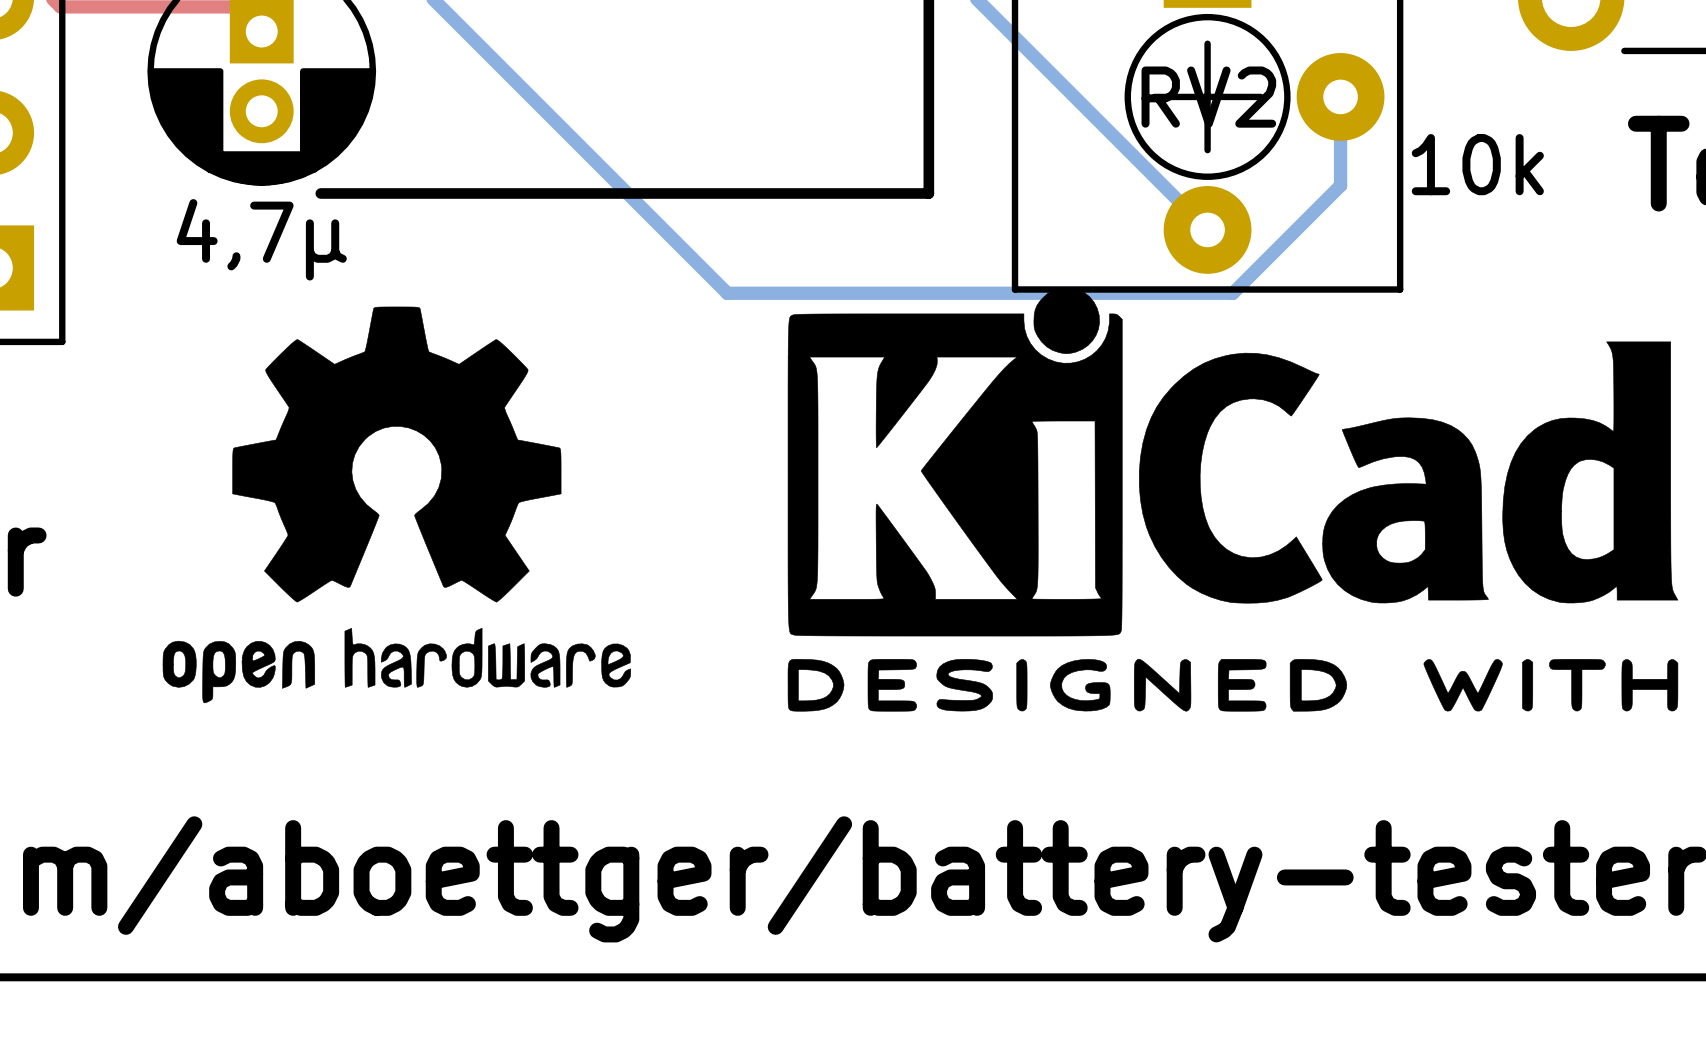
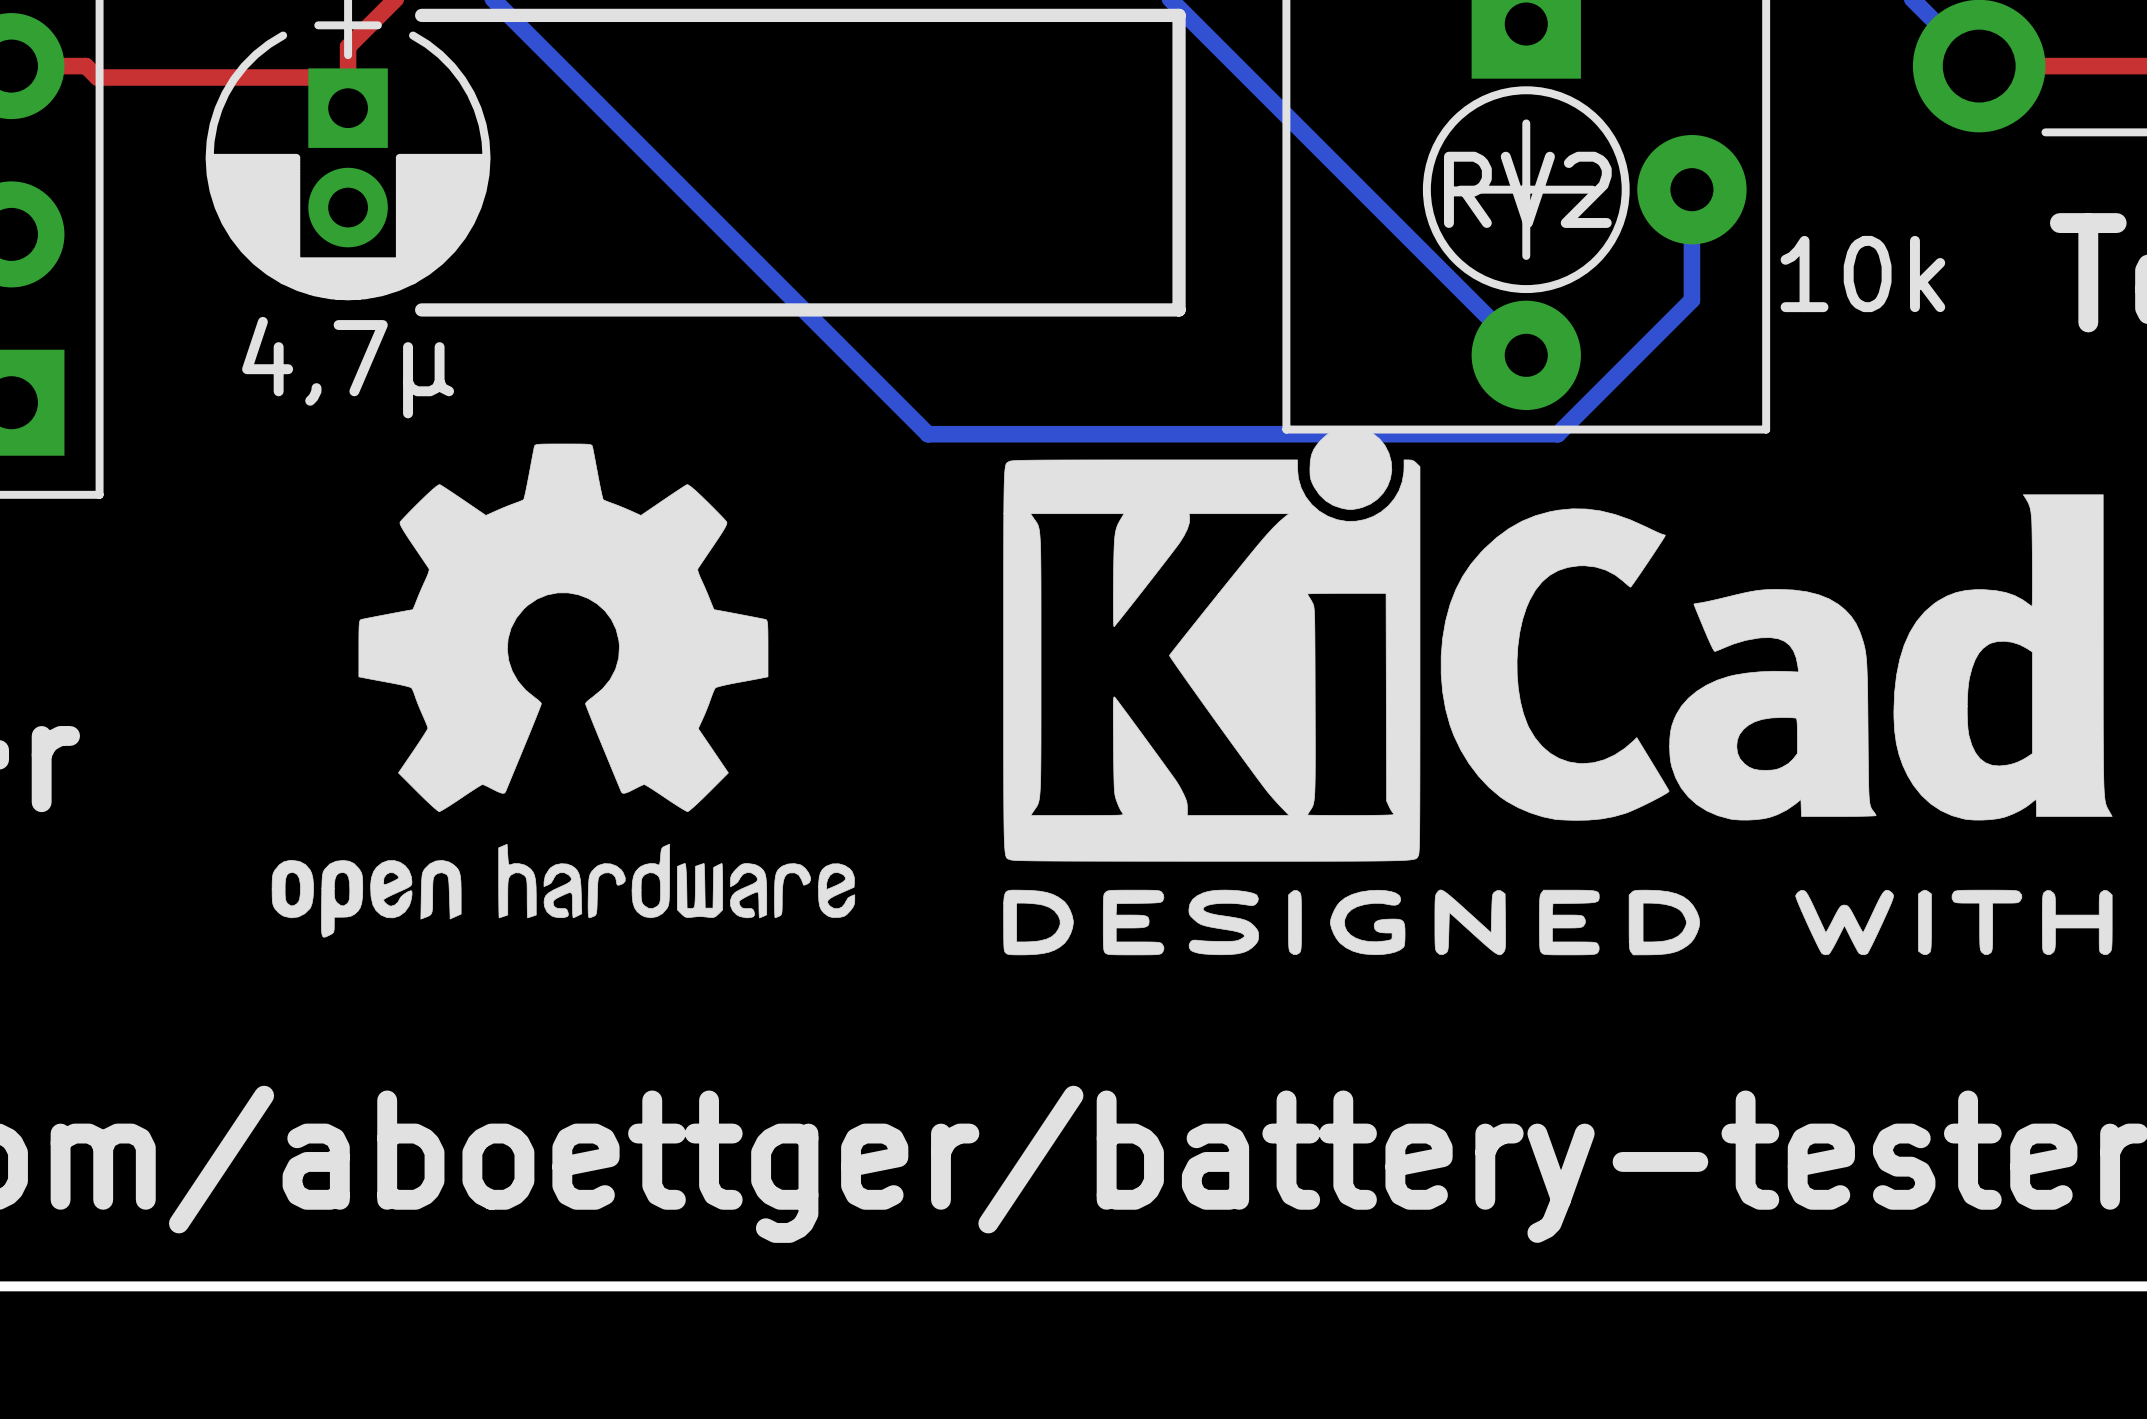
drawing position: (396, 504) -> (563, 690)

